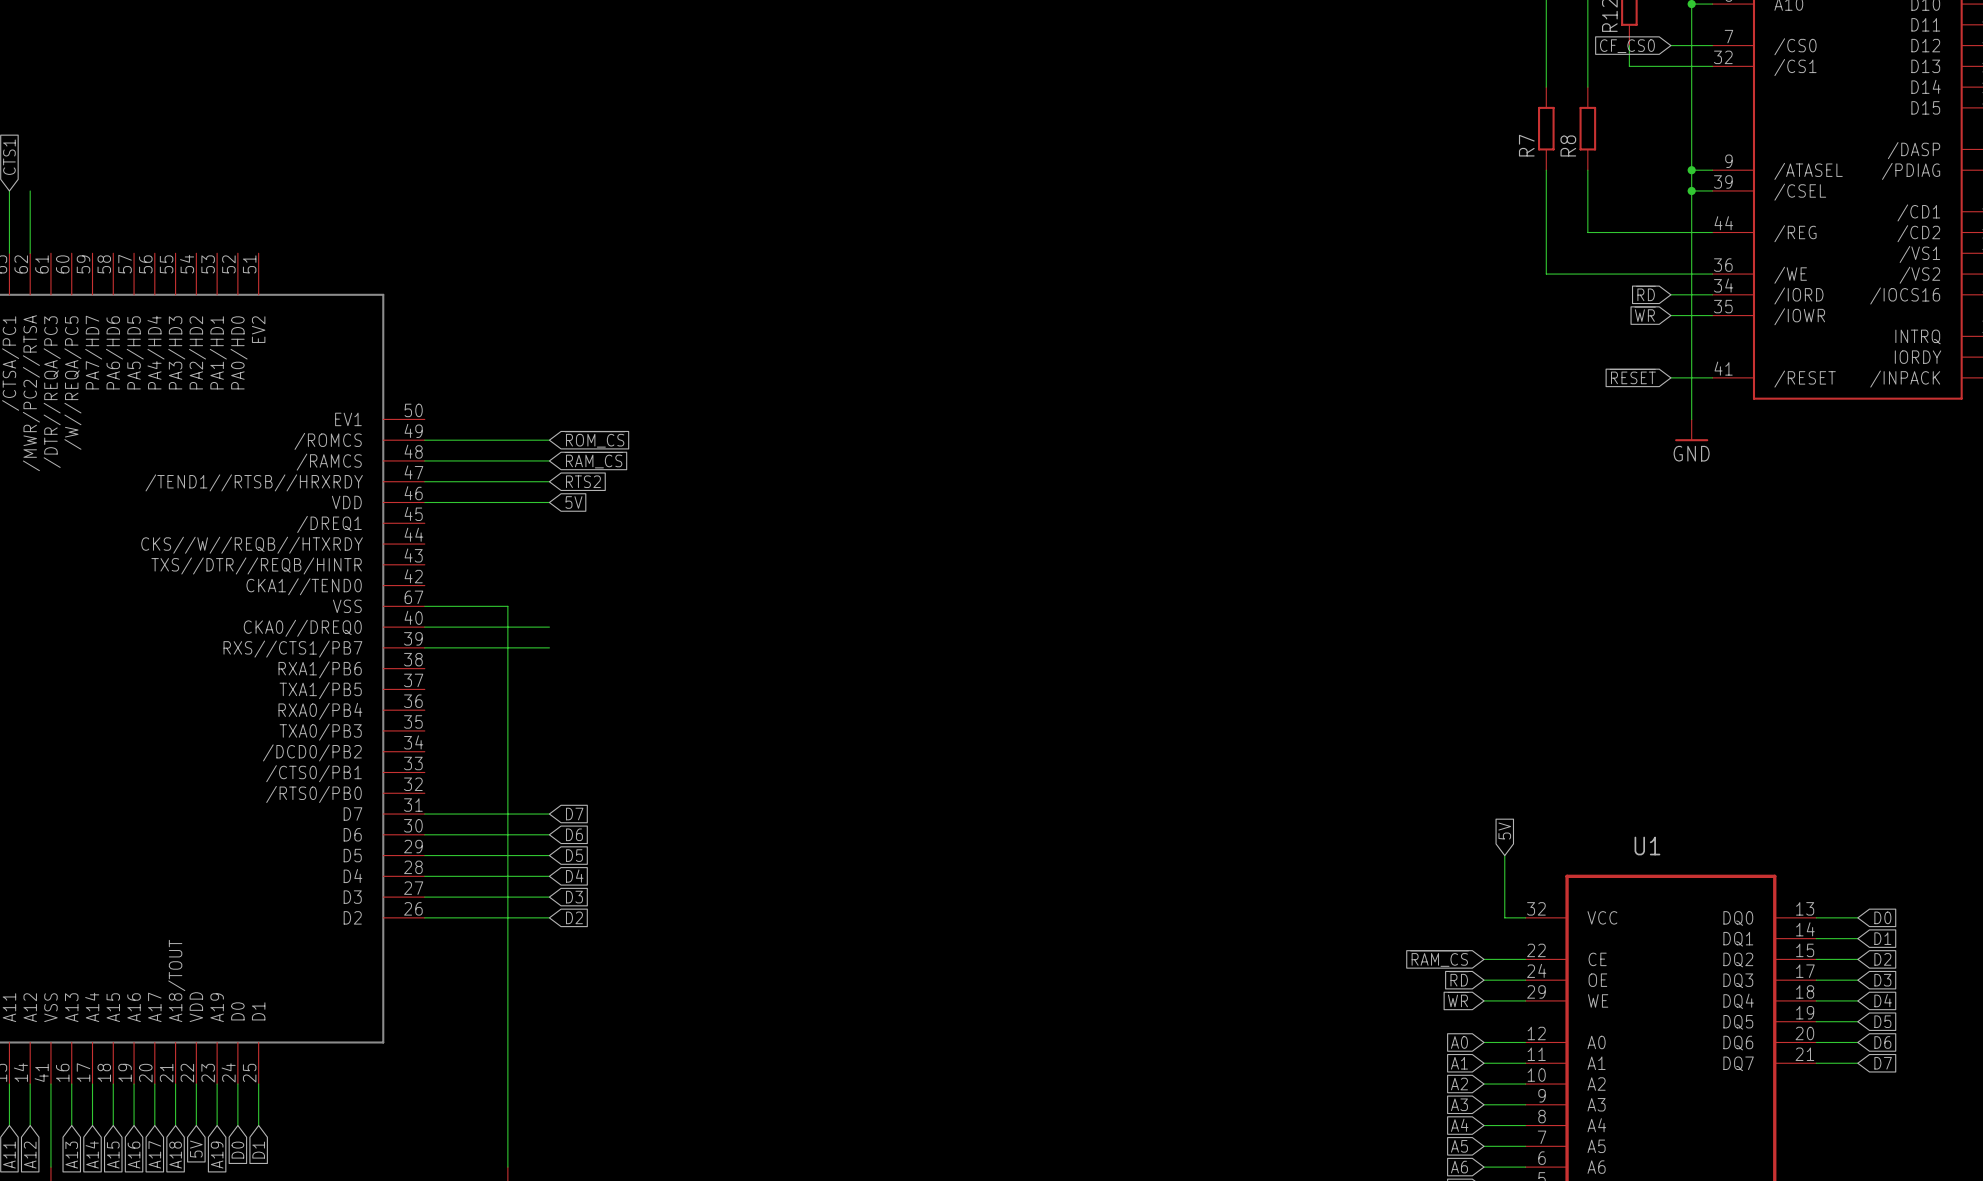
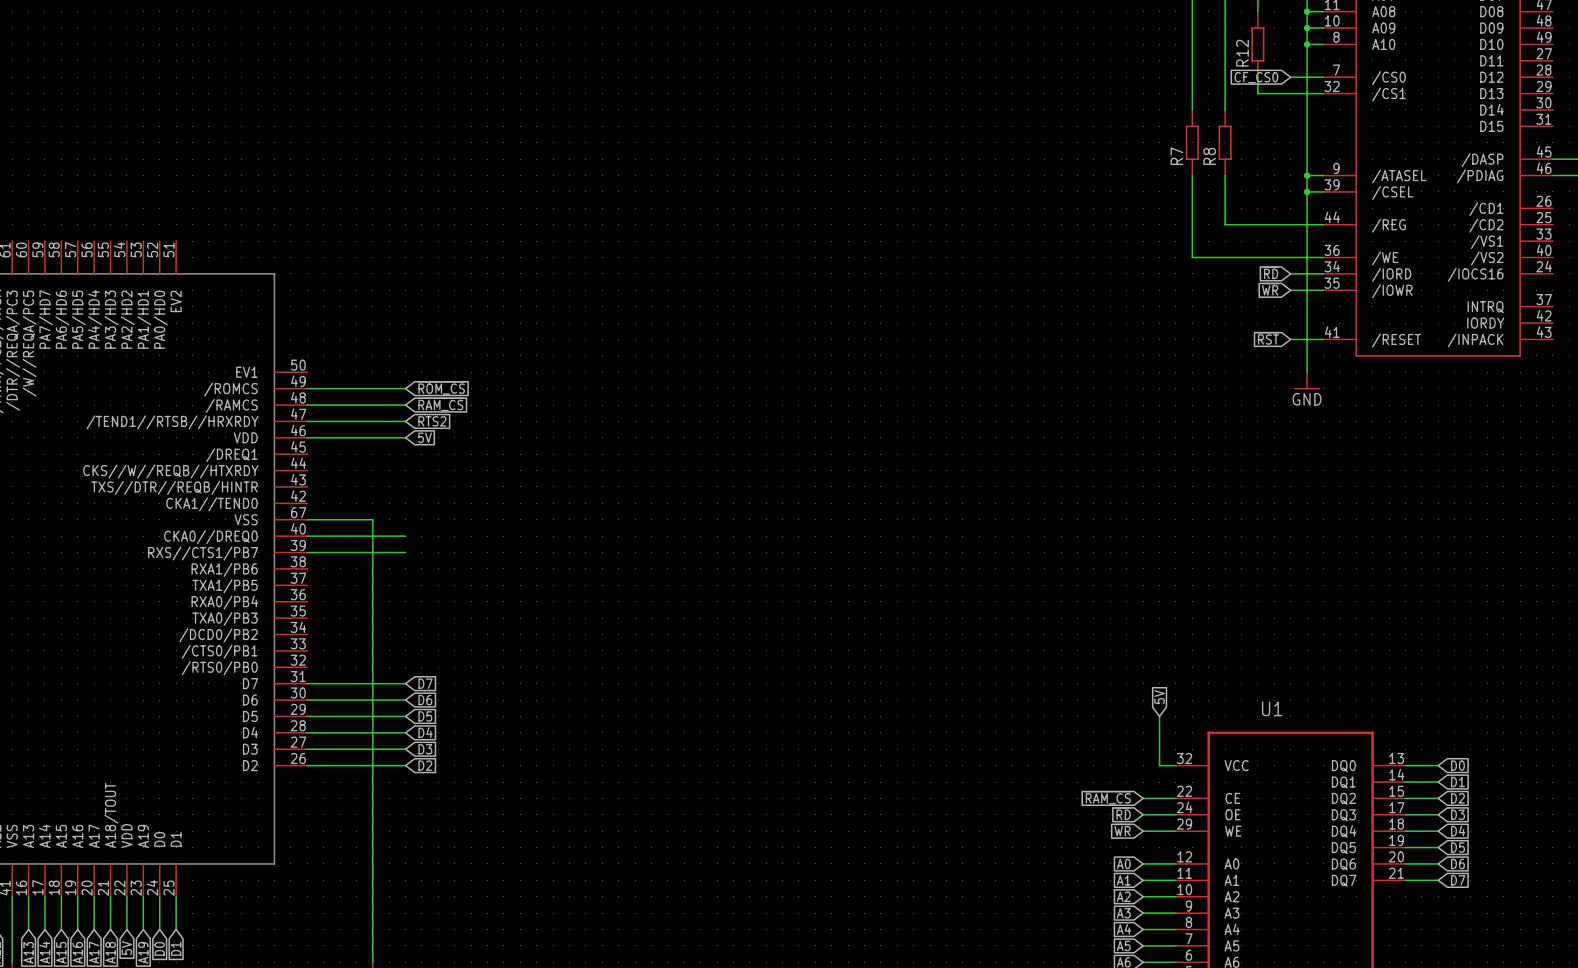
global label: ~{RESET} (1632, 376) -> ~{RST} (1267, 338)

